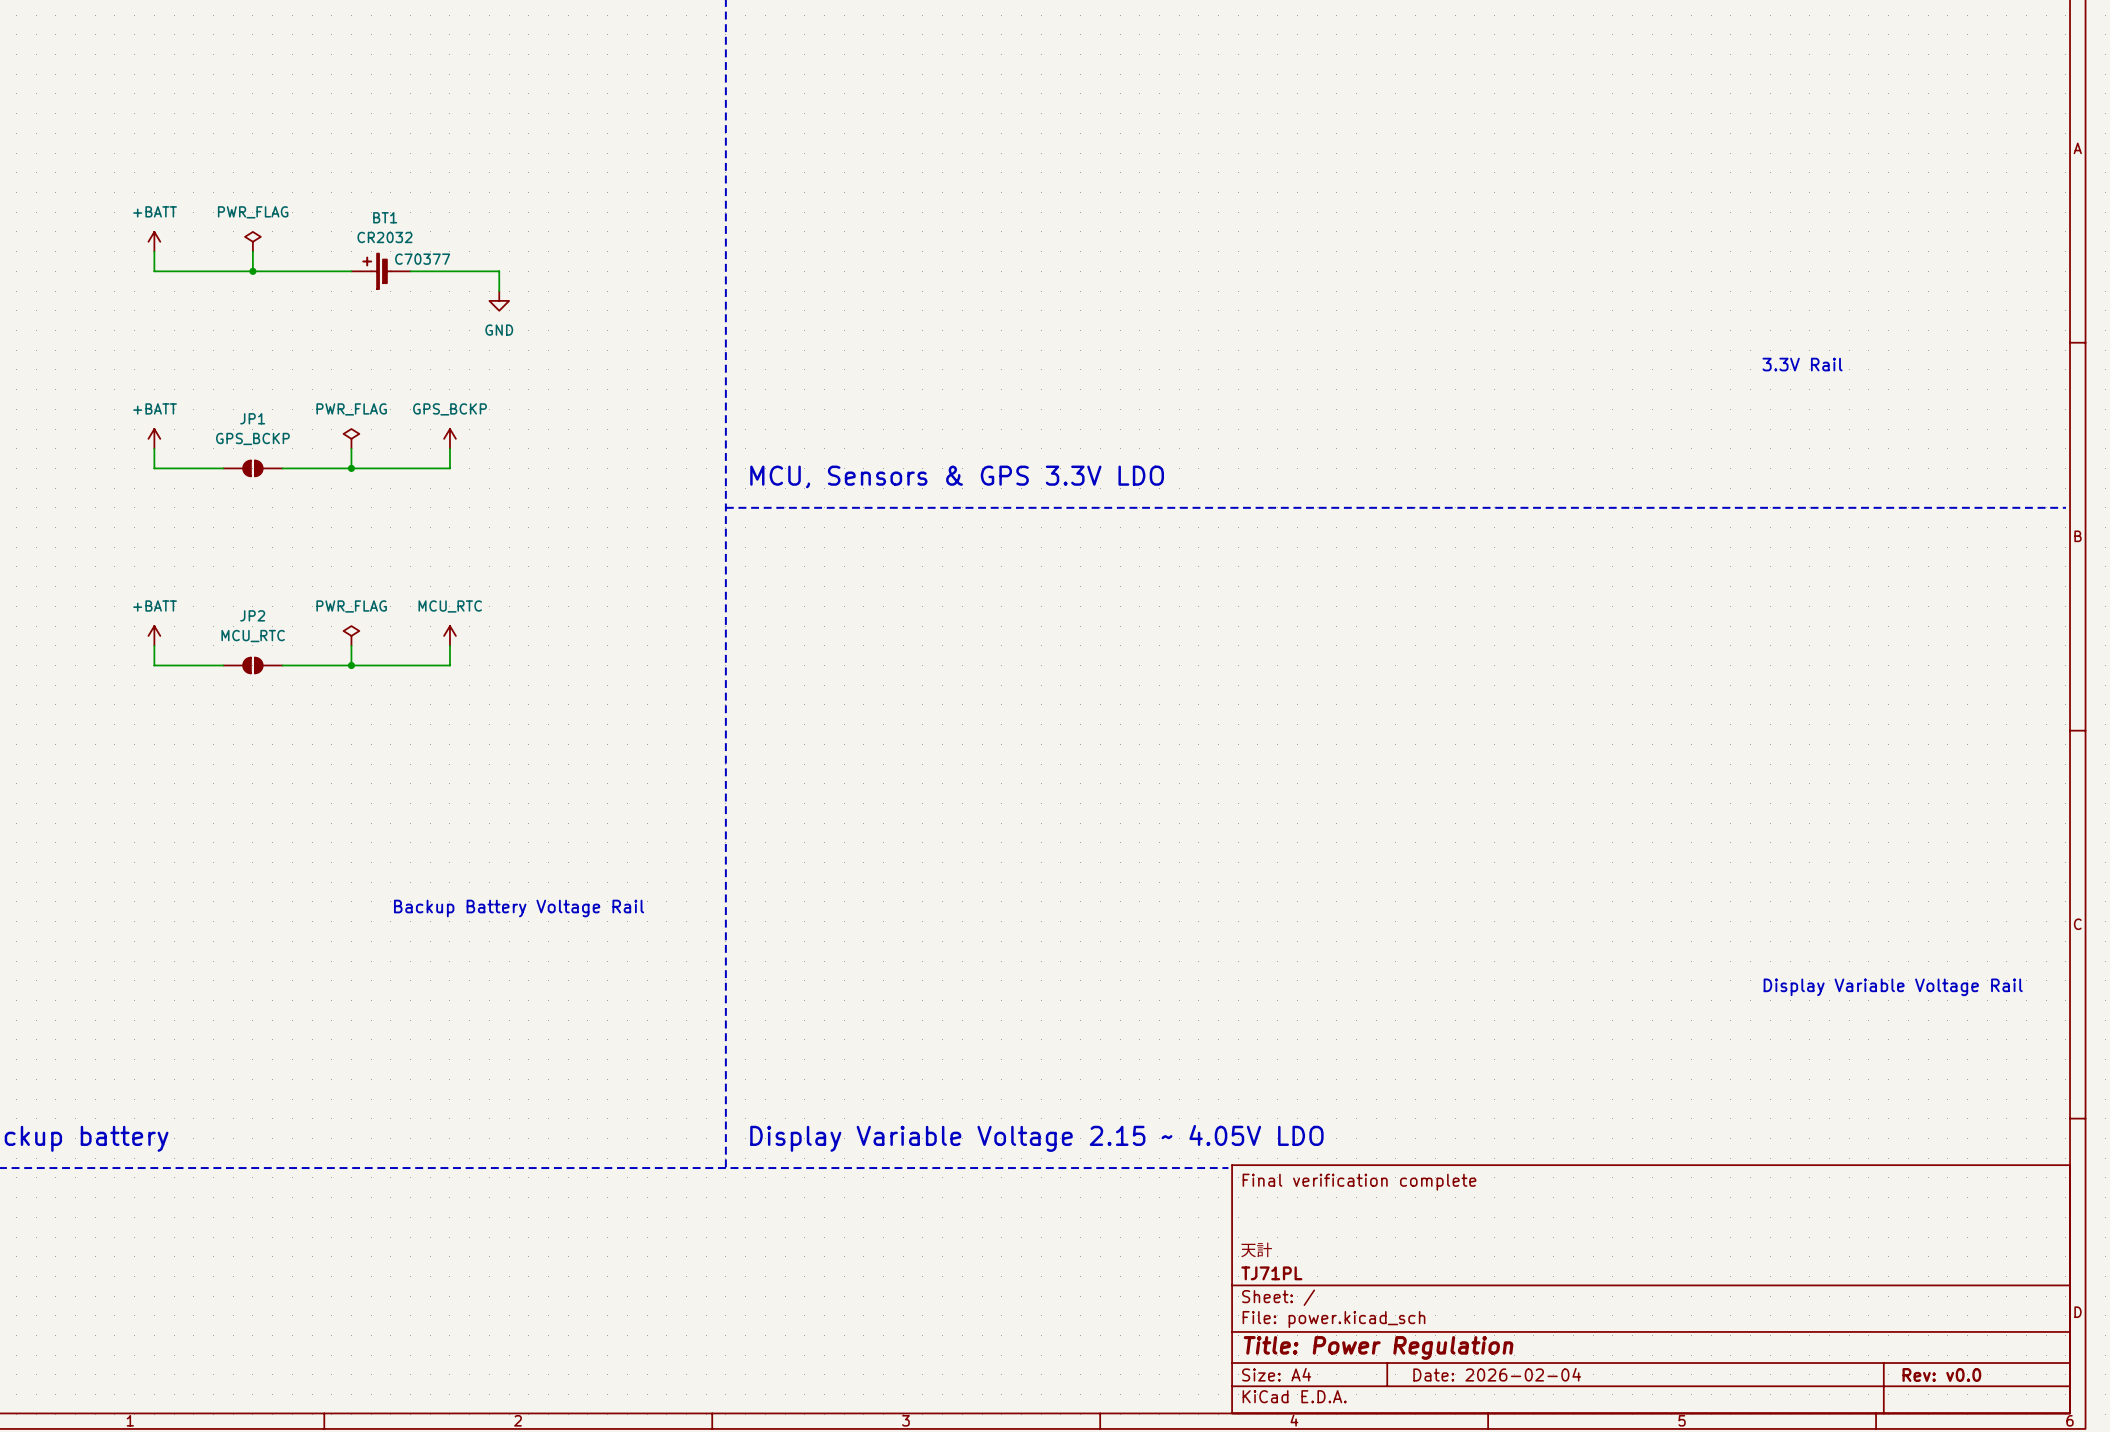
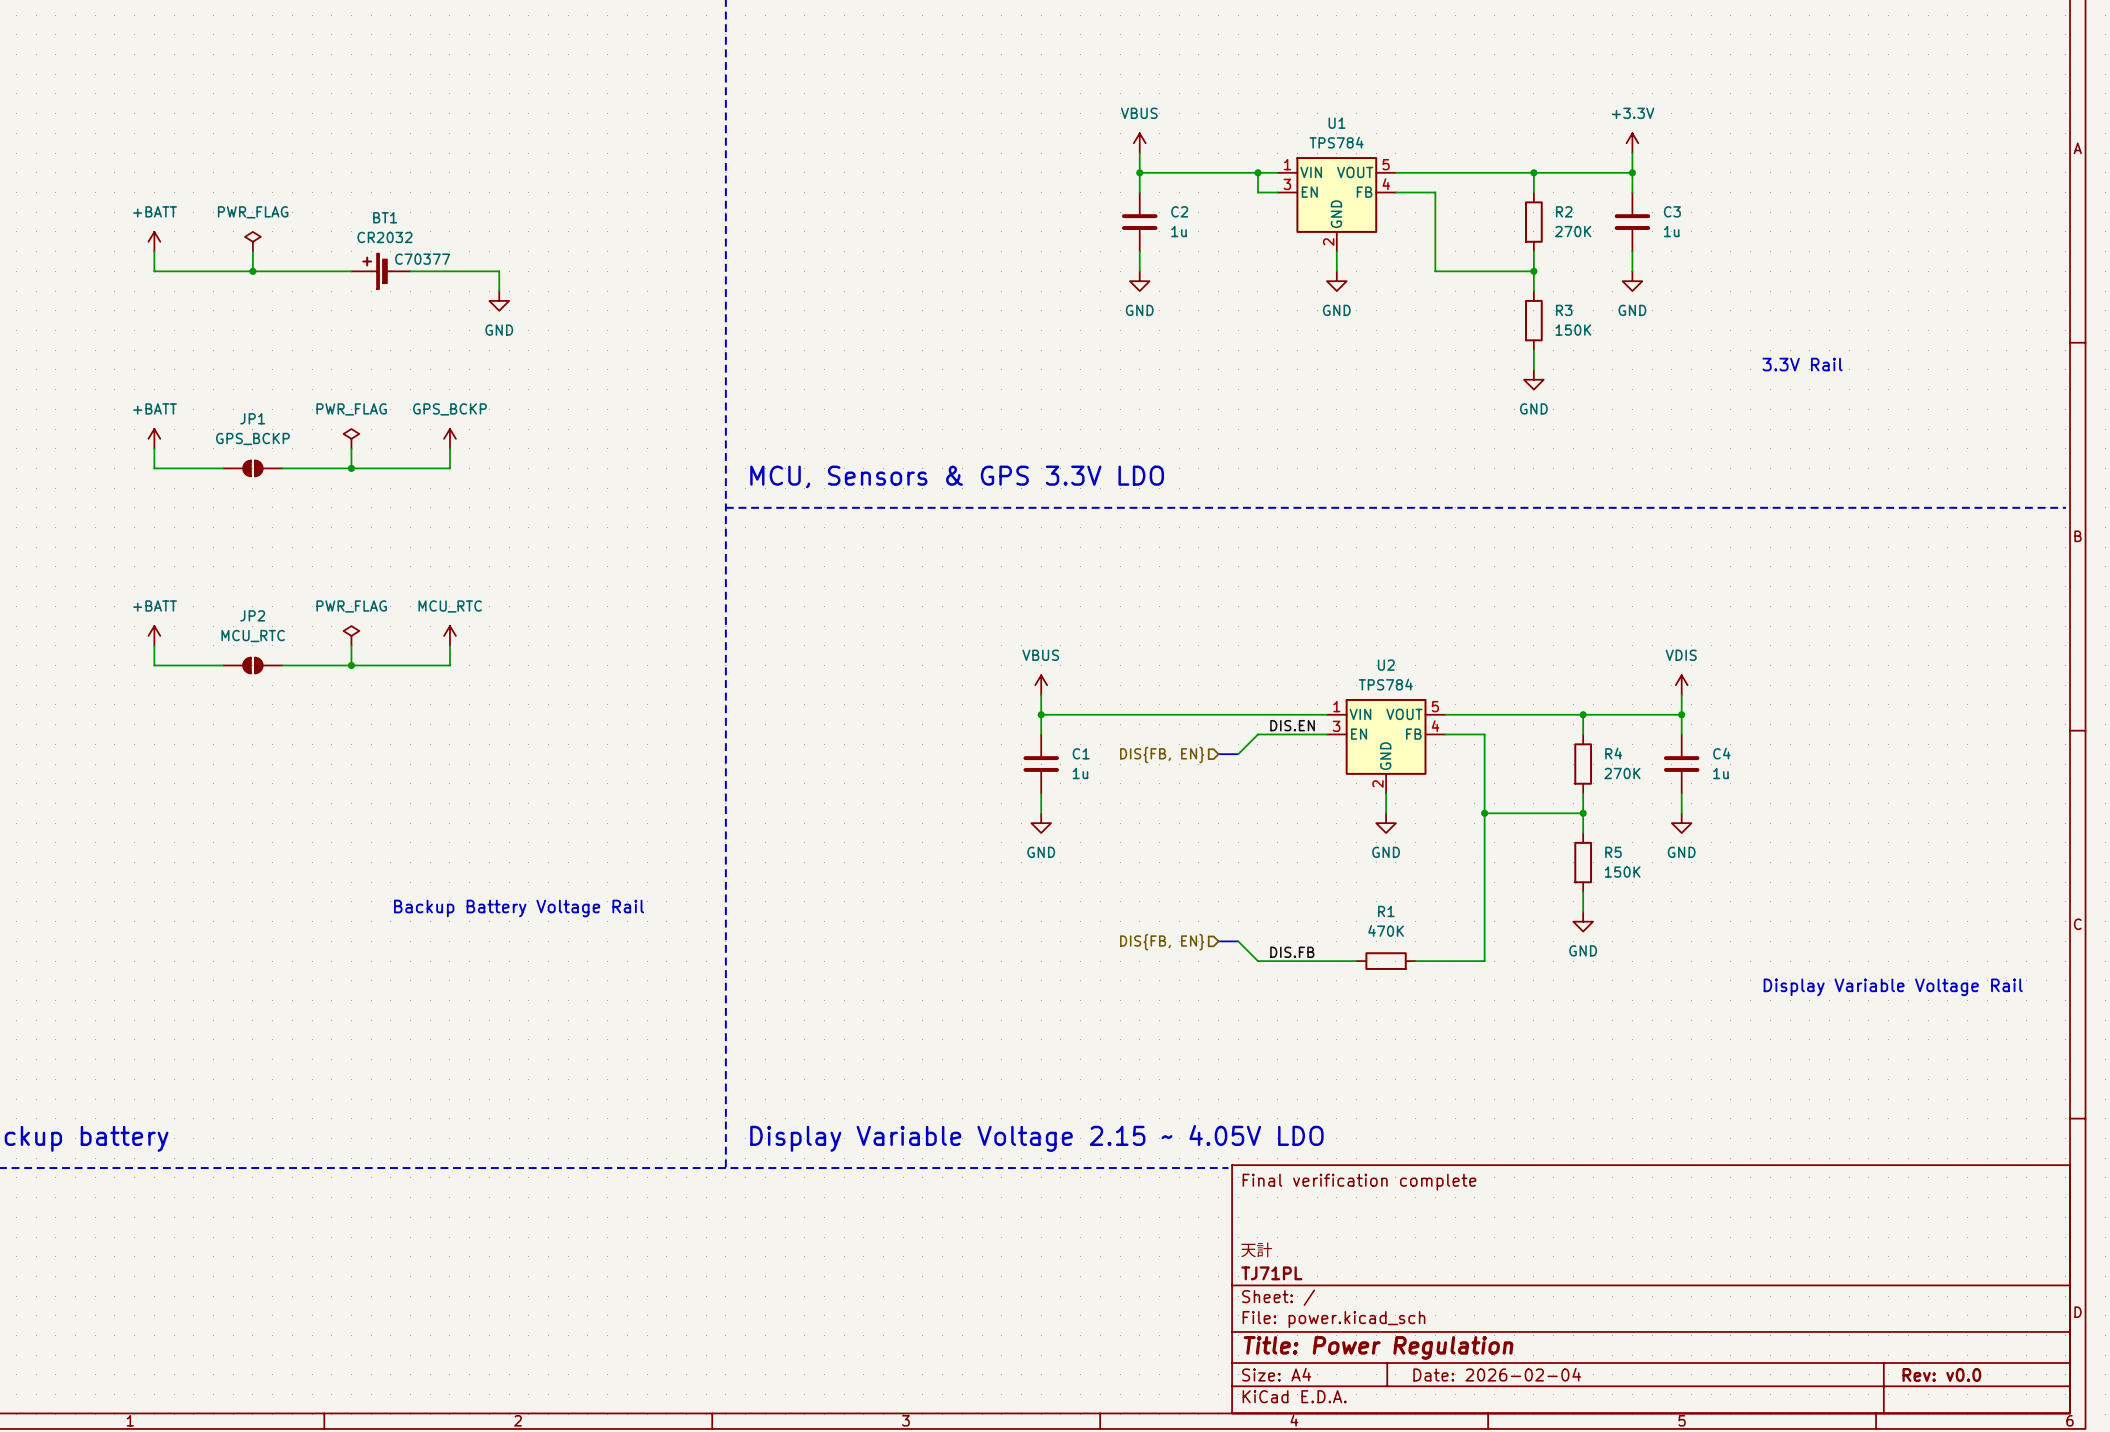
power symbol: none -> VBUS (1139, 143)
power symbol: none -> +3.3V (1632, 143)
wire: none -> (1139, 153) (1139, 192)
wire: none -> (1632, 153) (1632, 192)
wire: none -> (1139, 172) (1277, 172)
junction: none -> (1139, 172)
wire: none -> (1257, 172) (1257, 192) (1277, 192)
junction: none -> (1257, 172)
wire: none -> (1395, 172) (1632, 172)
wire: none -> (1533, 172) (1533, 192)
junction: none -> (1533, 172)
junction: none -> (1632, 172)
wire: none -> (1395, 192) (1435, 192) (1435, 271) (1533, 271)
U1: none -> TPS784 (1336, 204)
C2: none -> 1u (1139, 222)
R2: none -> 270K (1533, 222)
C3: none -> 1u (1632, 222)
wire: none -> (1139, 251) (1139, 271)
wire: none -> (1336, 251) (1336, 271)
wire: none -> (1533, 251) (1533, 291)
wire: none -> (1632, 251) (1632, 271)
junction: none -> (1533, 271)
power symbol: none -> GND (1139, 281)
power symbol: none -> GND (1336, 281)
power symbol: none -> GND (1632, 281)
R3: none -> 150K (1533, 320)
wire: none -> (1533, 350) (1533, 369)
power symbol: none -> GND (1533, 379)
power symbol: none -> VBUS (1041, 685)
power symbol: none -> VDIS (1681, 685)
wire: none -> (1041, 695) (1041, 734)
wire: none -> (1681, 695) (1681, 734)
wire: none -> (1041, 714) (1326, 714)
junction: none -> (1041, 714)
wire: none -> (1445, 714) (1681, 714)
wire: none -> (1583, 714) (1583, 734)
junction: none -> (1583, 714)
junction: none -> (1681, 714)
label: none -> DIS.EN (1292, 725)
wire: none -> (1326, 734) (1257, 734) (1238, 754)
wire: none -> (1445, 734) (1484, 734) (1484, 961) (1415, 961)
U2: none -> TPS784 (1386, 746)
hierarchical label: none -> DIS{FB, EN} (1162, 754)
bus: none -> (1218, 754) (1238, 754)
C1: none -> 1u (1041, 764)
R4: none -> 270K (1583, 764)
C4: none -> 1u (1681, 764)
wire: none -> (1041, 793) (1041, 813)
wire: none -> (1386, 793) (1386, 813)
wire: none -> (1583, 793) (1583, 833)
wire: none -> (1681, 793) (1681, 813)
wire: none -> (1484, 813) (1583, 813)
junction: none -> (1484, 813)
junction: none -> (1583, 813)
power symbol: none -> GND (1041, 823)
power symbol: none -> GND (1386, 823)
power symbol: none -> GND (1681, 823)
R5: none -> 150K (1583, 862)
wire: none -> (1583, 892) (1583, 911)
power symbol: none -> GND (1583, 921)
bus: none -> (1218, 941) (1238, 941)
wire: none -> (1238, 941) (1257, 961) (1356, 961)
hierarchical label: none -> DIS{FB, EN} (1162, 942)
label: none -> DIS.FB (1292, 952)
R1: none -> 470K (1386, 961)

